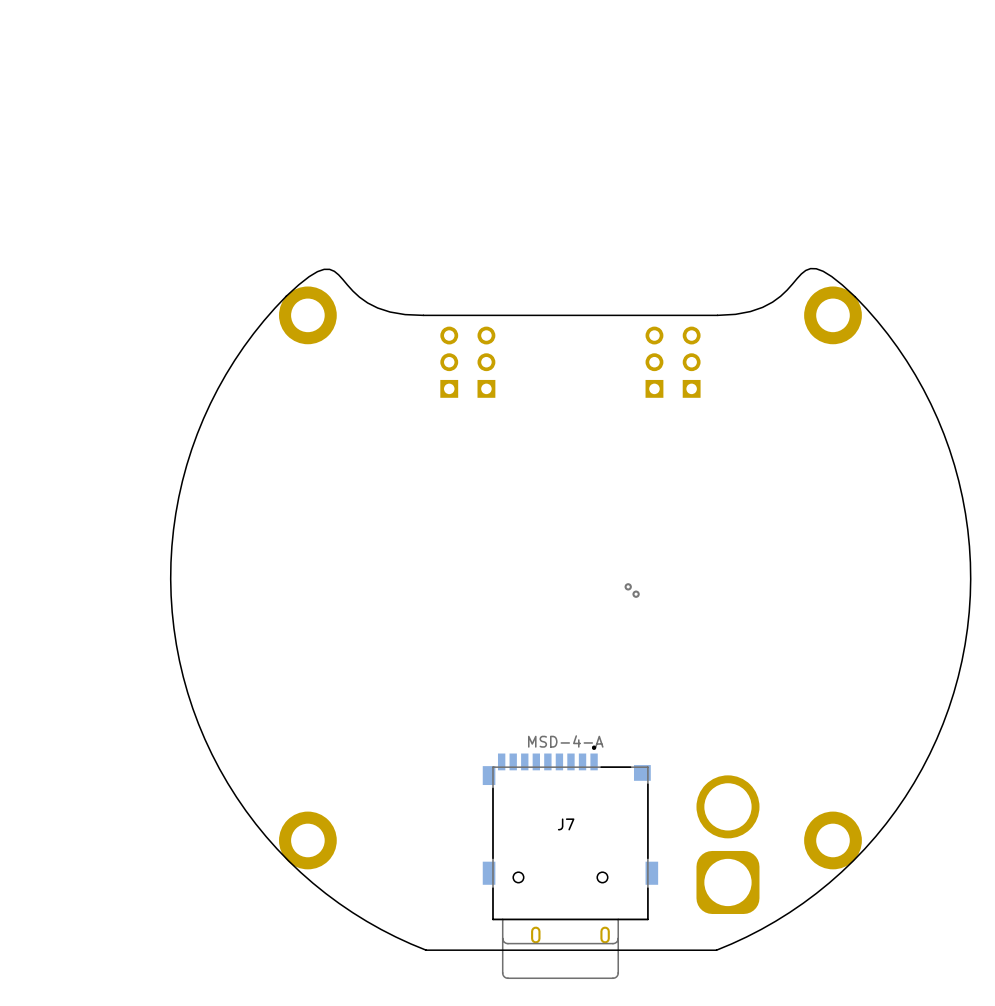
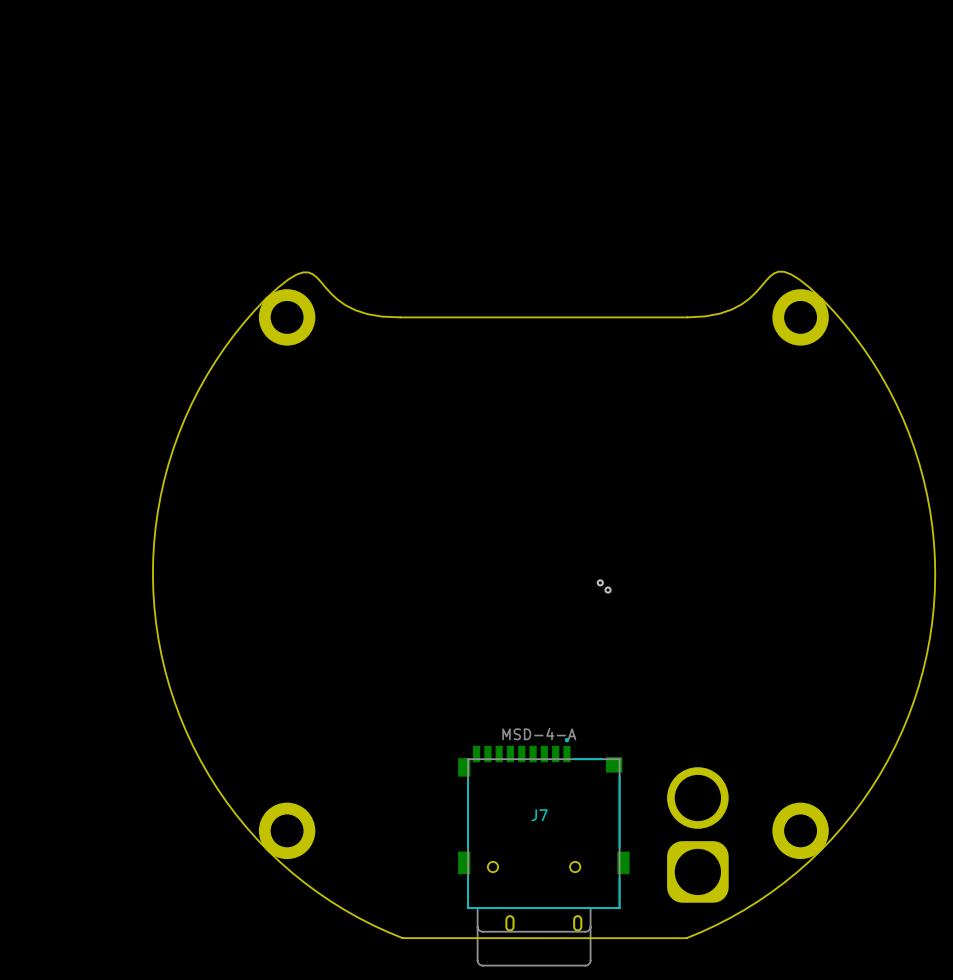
part: (449, 362) -> none
part: (486, 362) -> none
part: (654, 362) -> none
part: (691, 362) -> none

